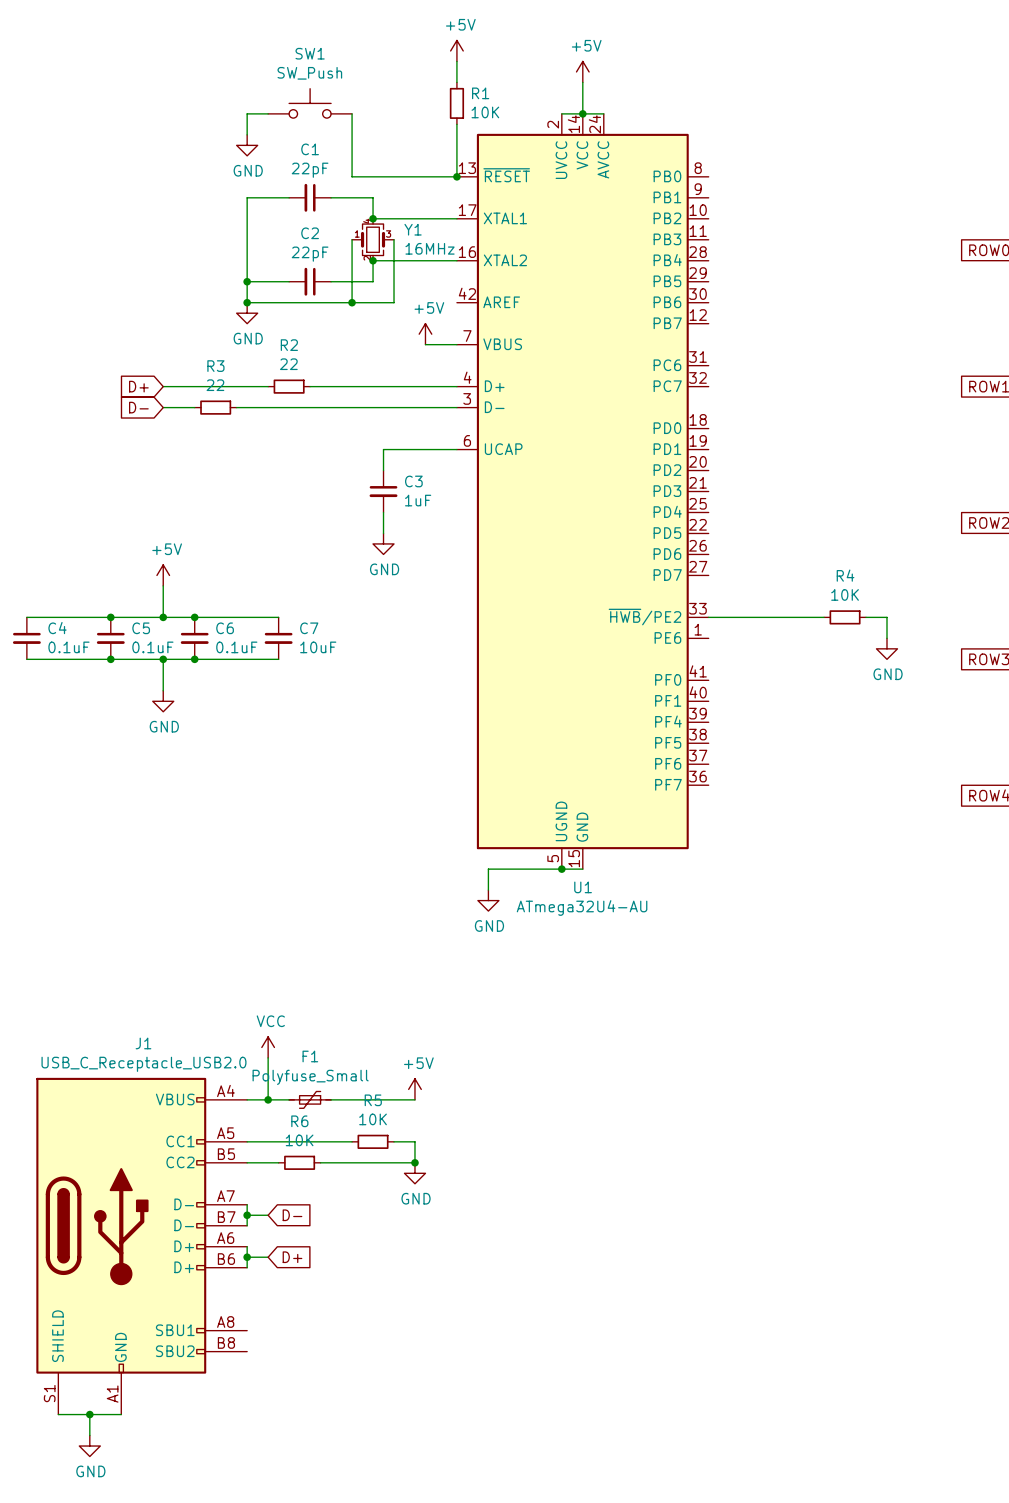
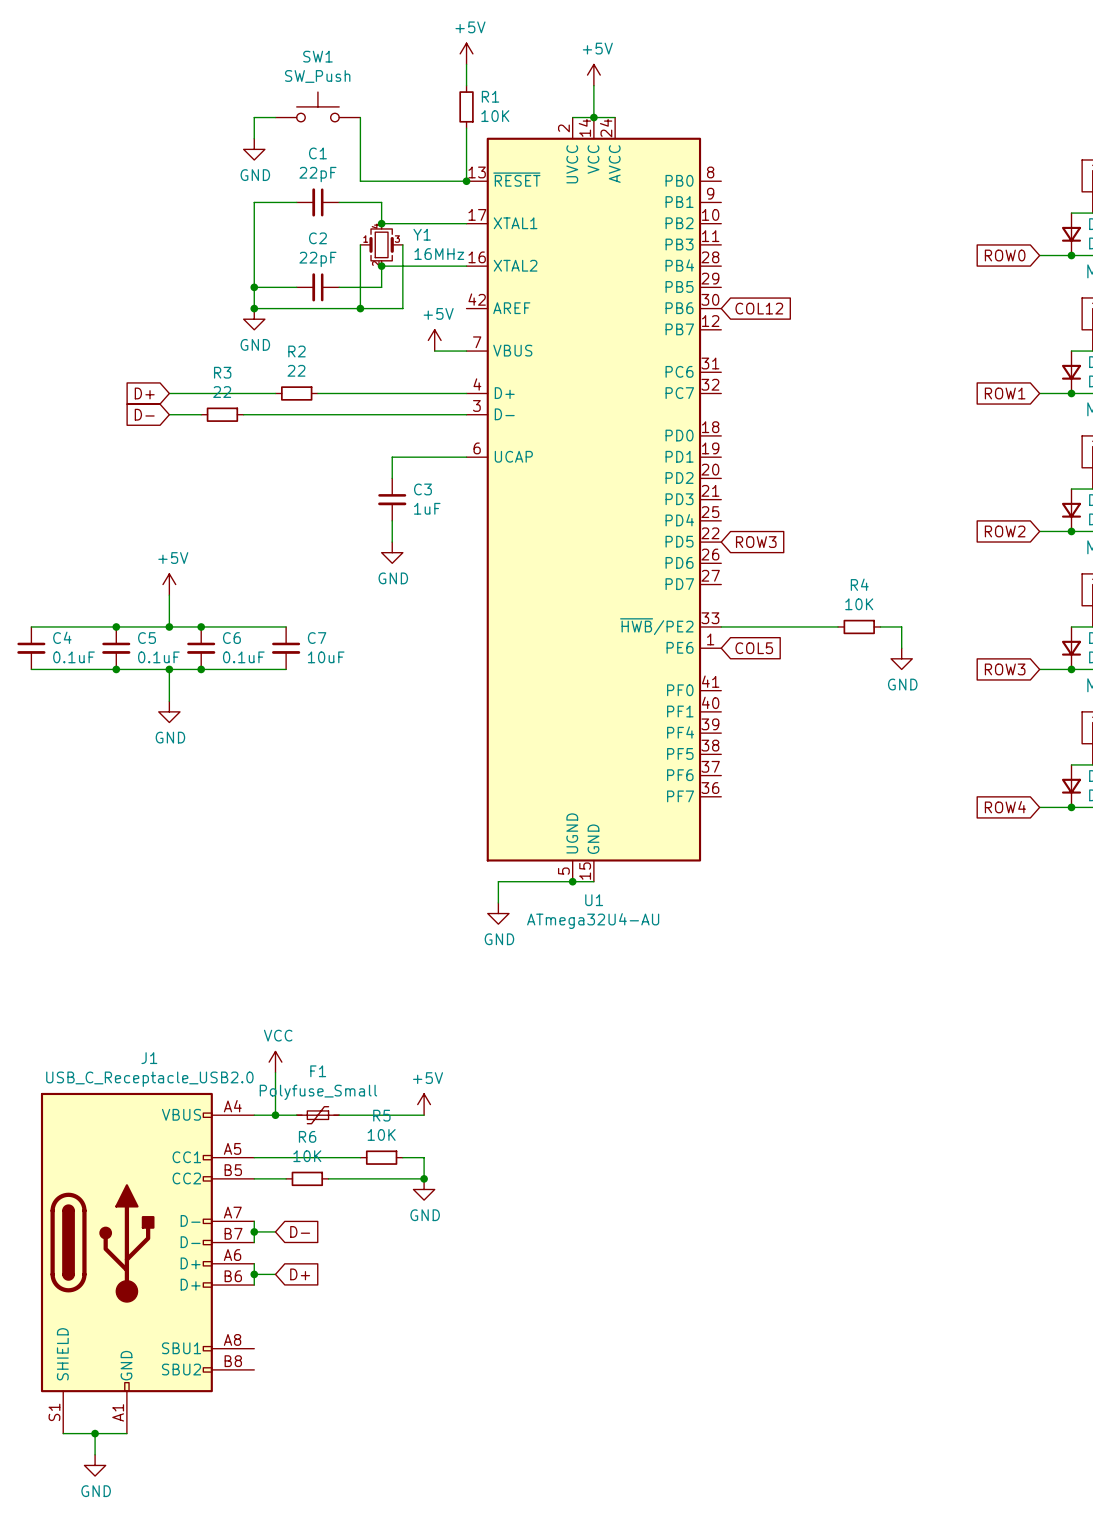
global label: none -> COL12 (759, 308)
global label: none -> ROW3 (756, 542)
global label: none -> COL5 (754, 648)

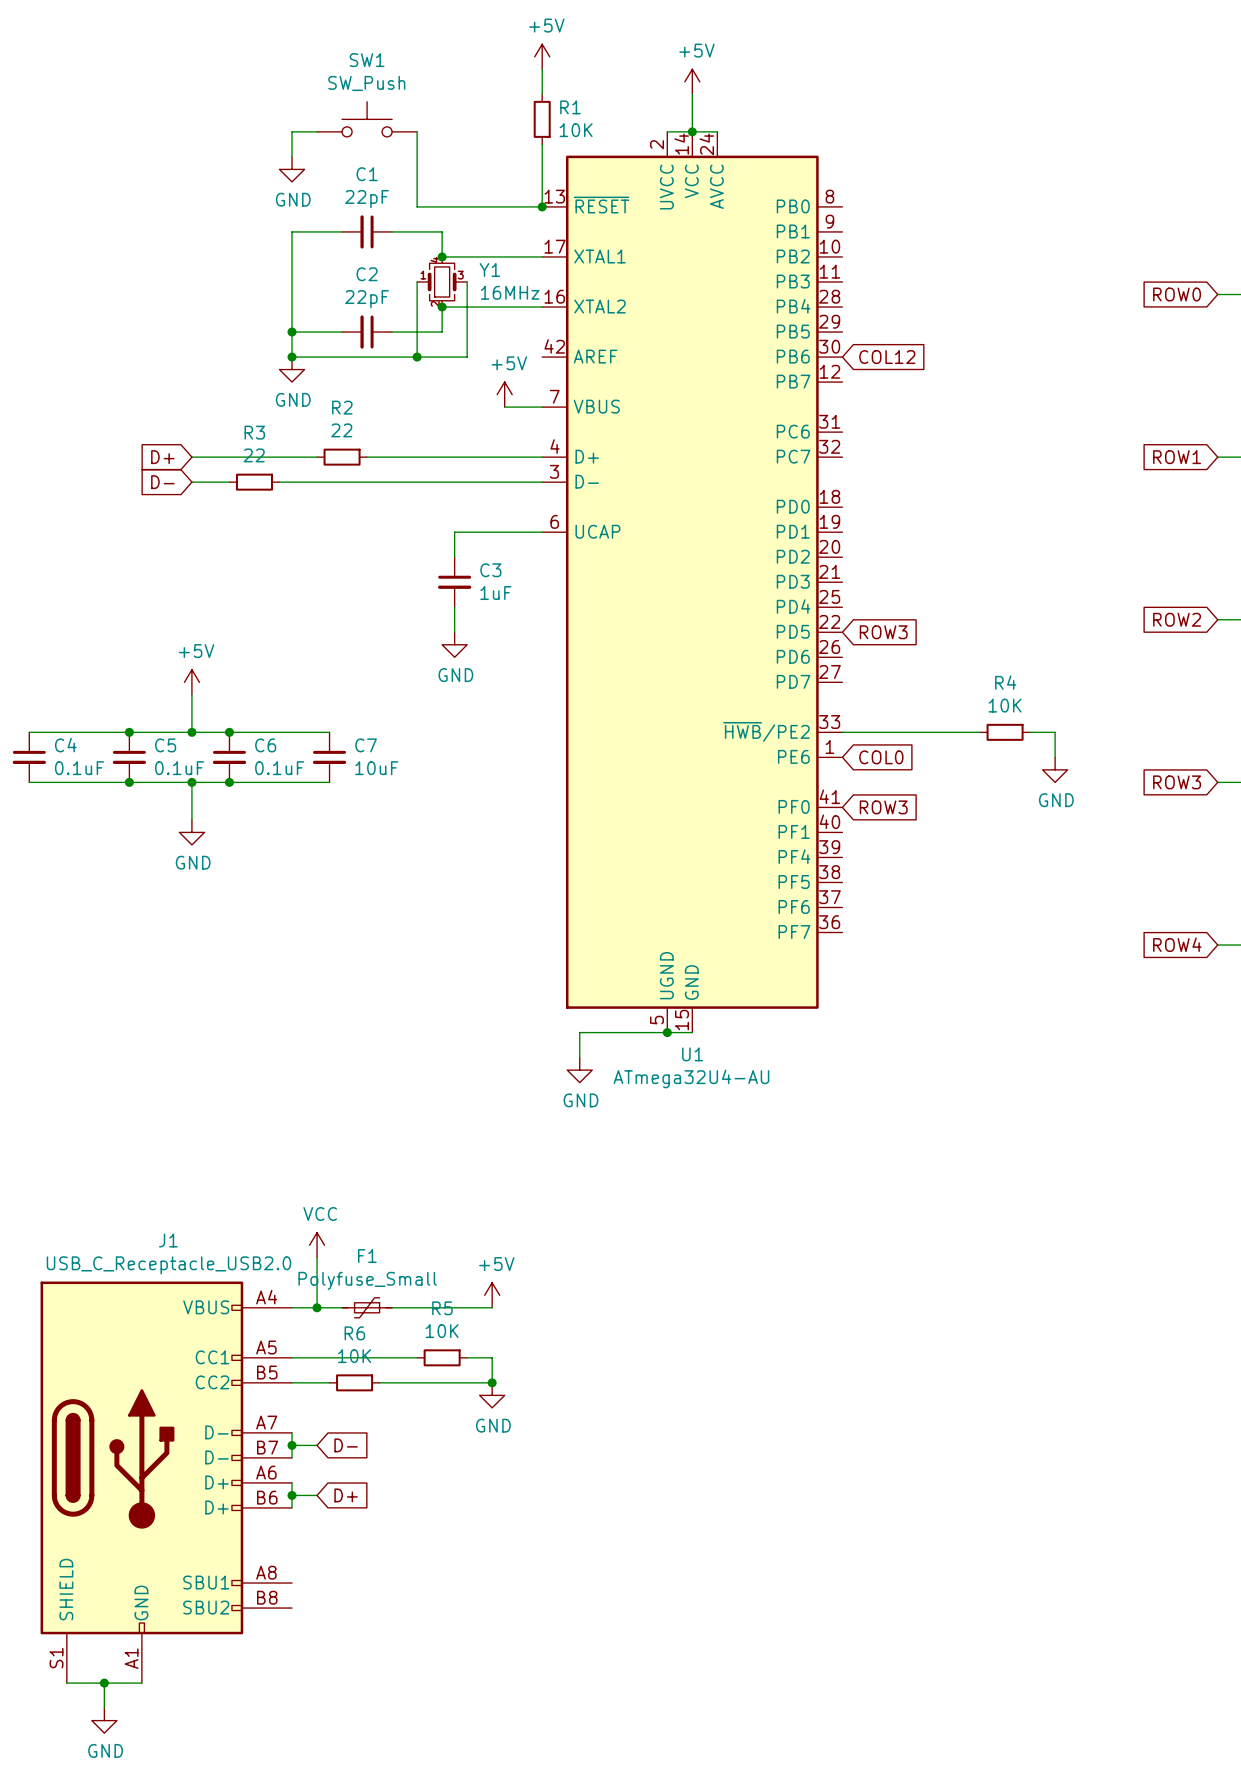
global label: COL5 (754, 648) -> COL0 (881, 757)
global label: none -> ROW3 (883, 807)

